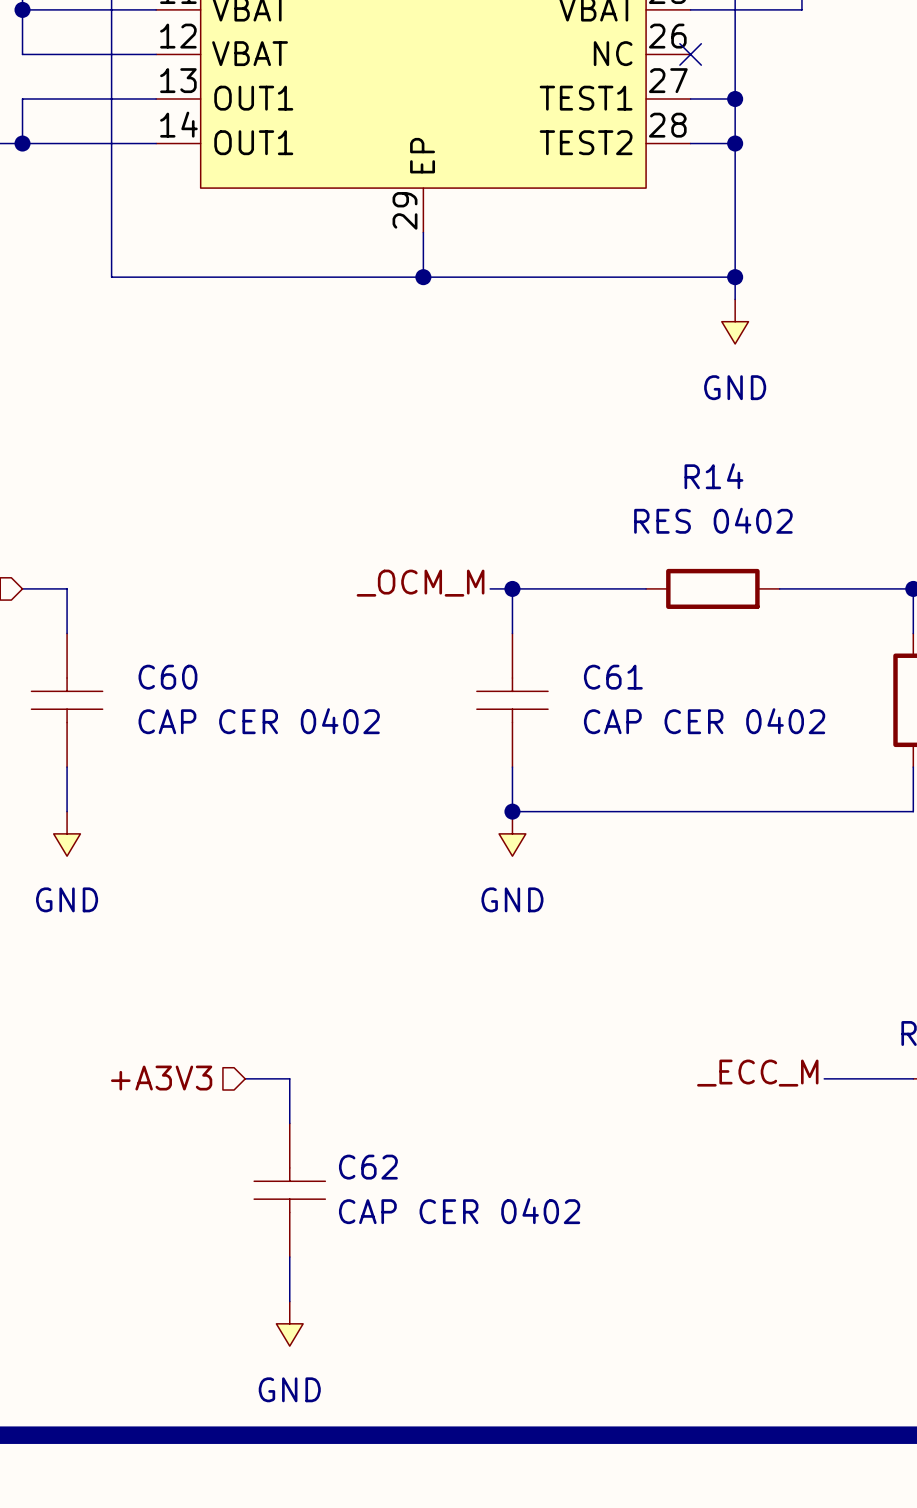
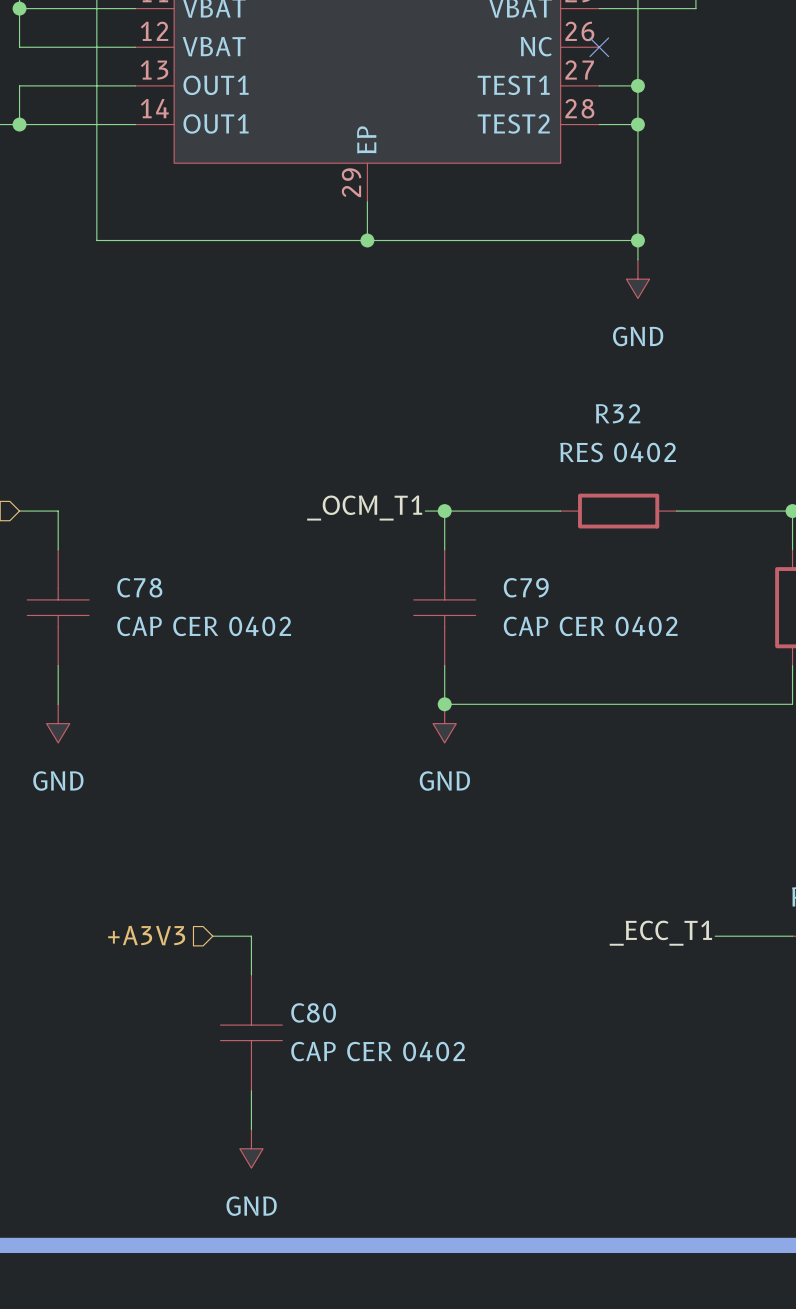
R14 name: R14 (713, 476) -> R32 (618, 413)
label: _OCM_M (420, 583) -> _OCM_T1 (364, 508)
C60 name: C60 (167, 677) -> C78 (139, 587)
C61 name: C61 (613, 677) -> C79 (526, 587)
label: _ECC_M (757, 1073) -> _ECC_T1 (660, 933)
C62 name: C62 (368, 1167) -> C80 (313, 1012)

